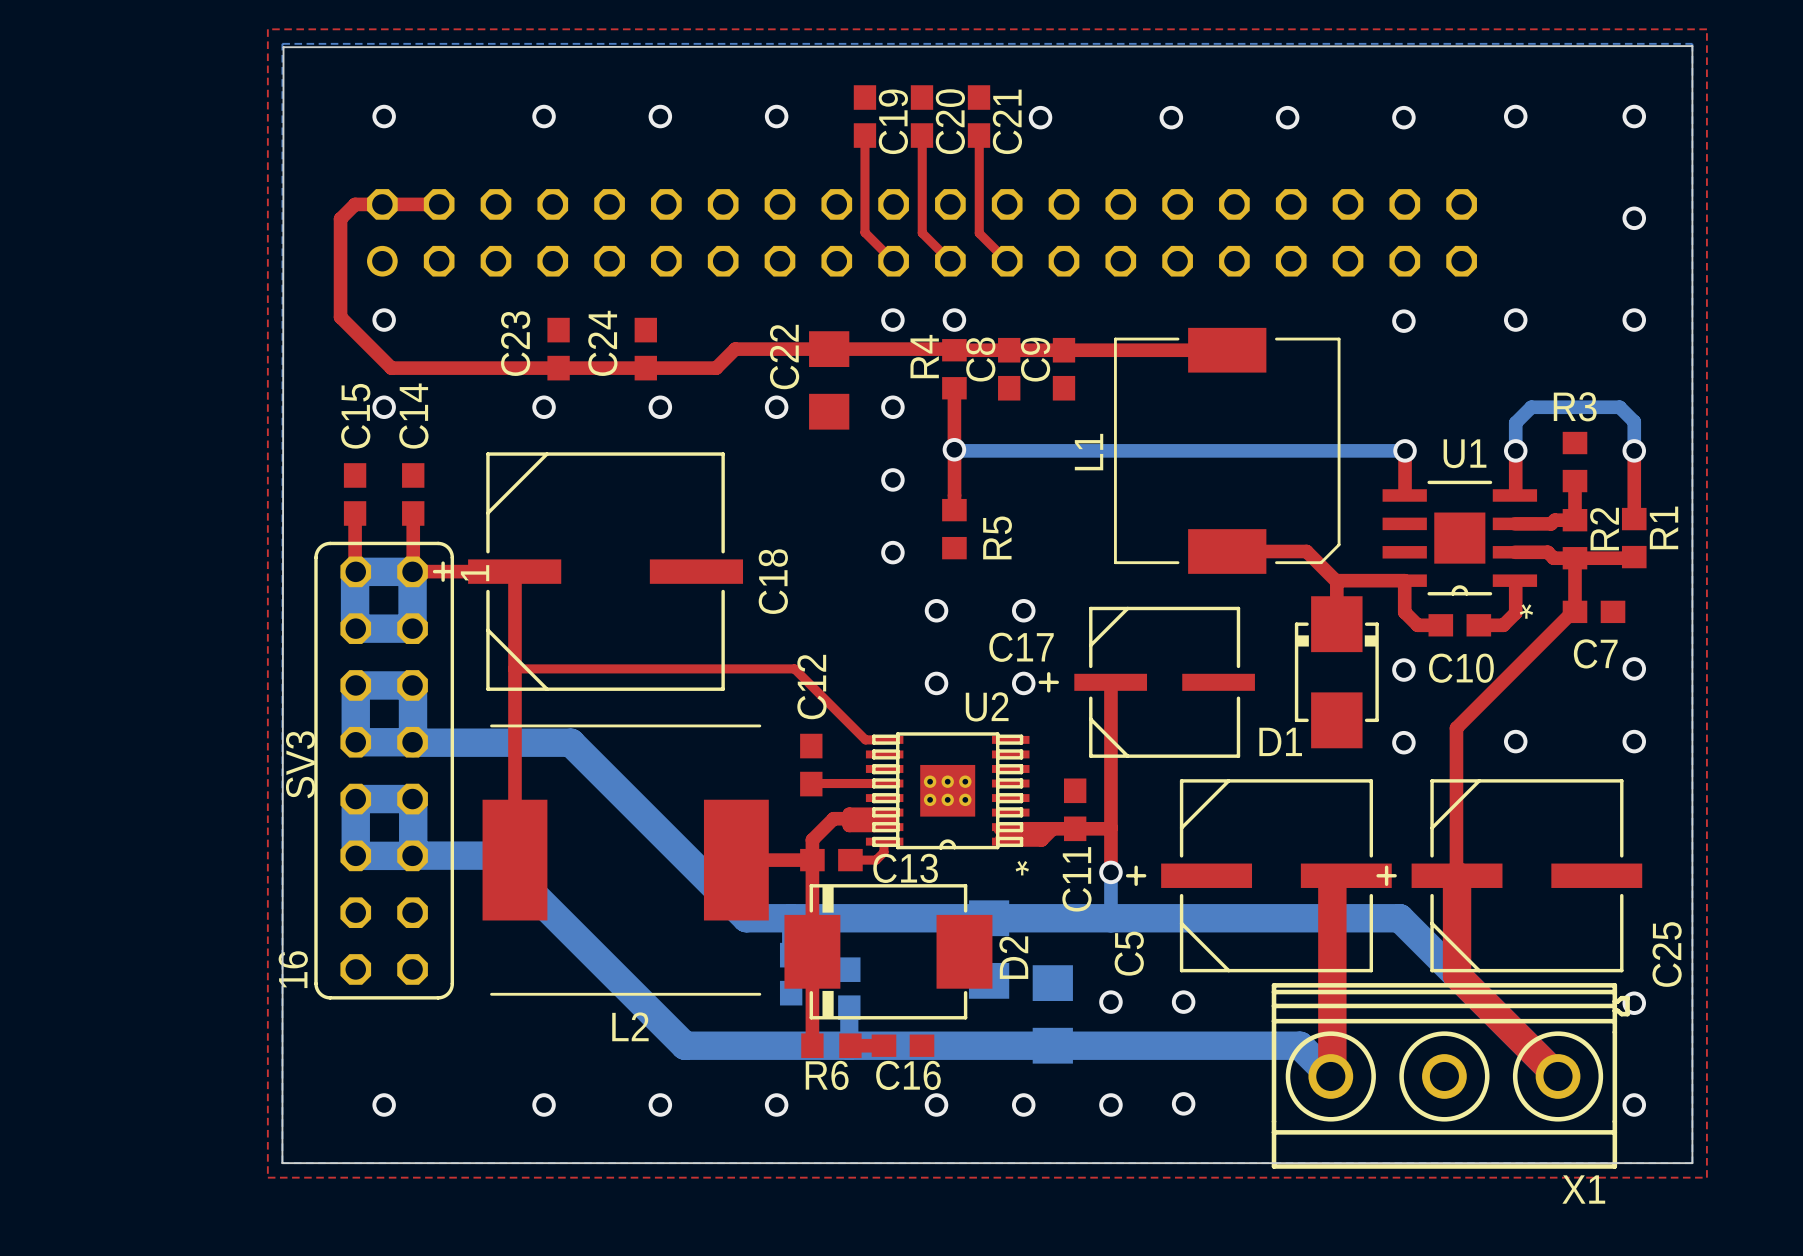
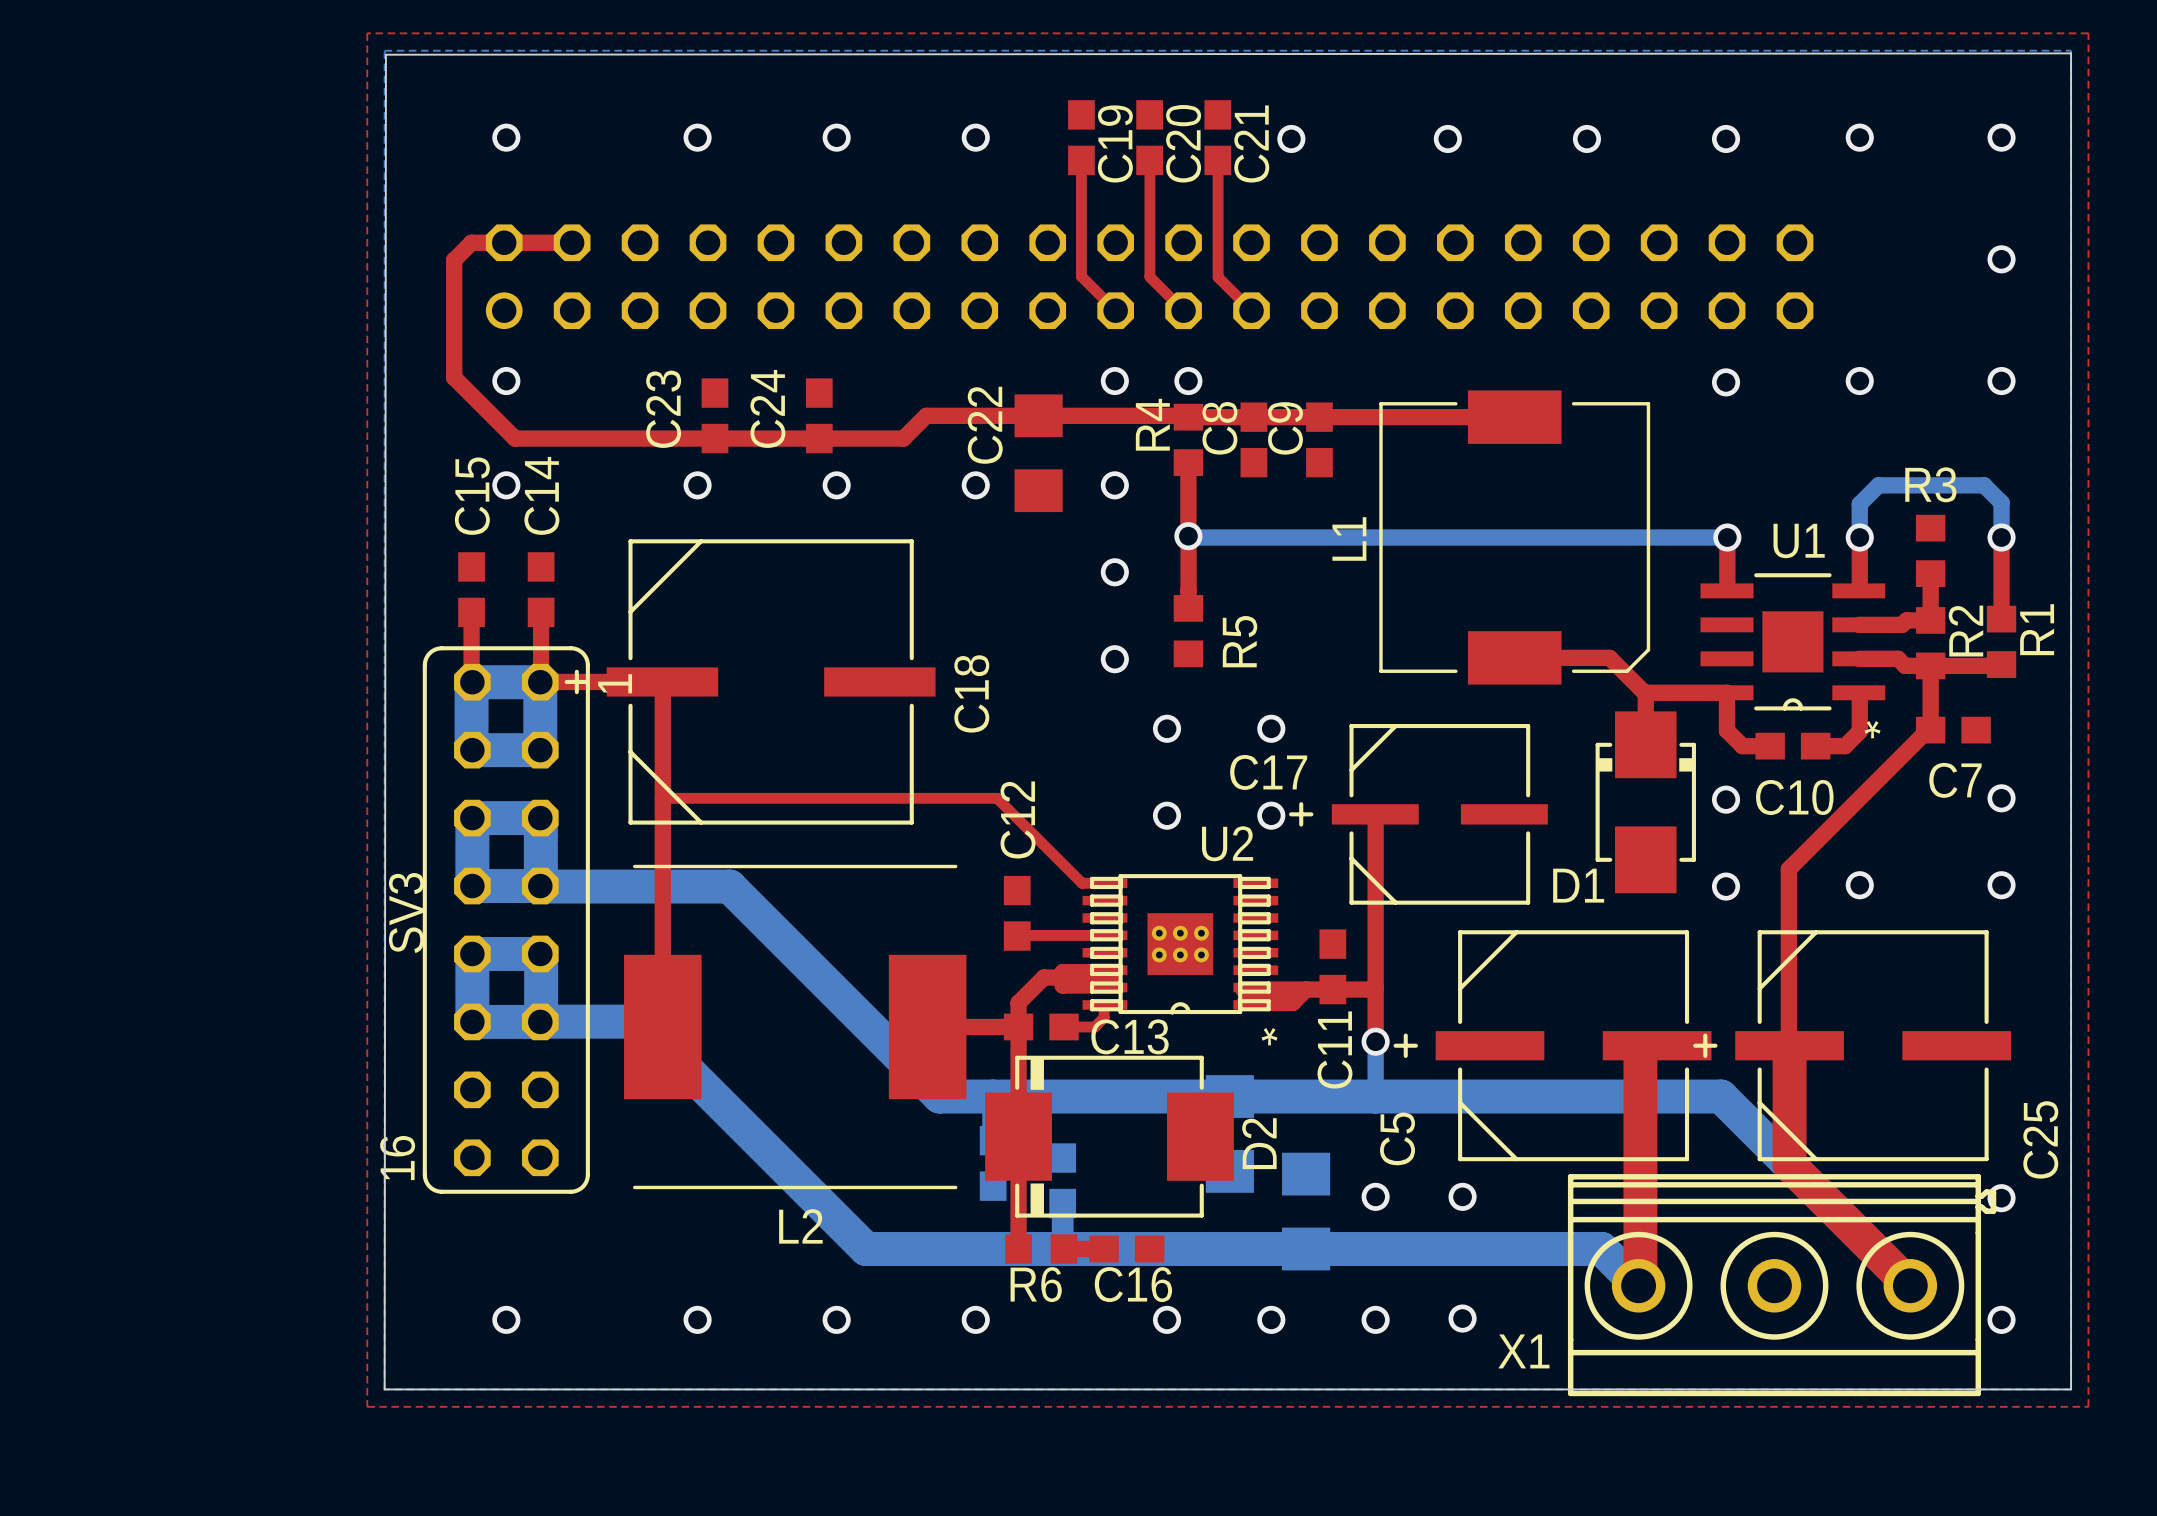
X1 name position: X1 (1583, 1189) -> X1 (1523, 1351)

